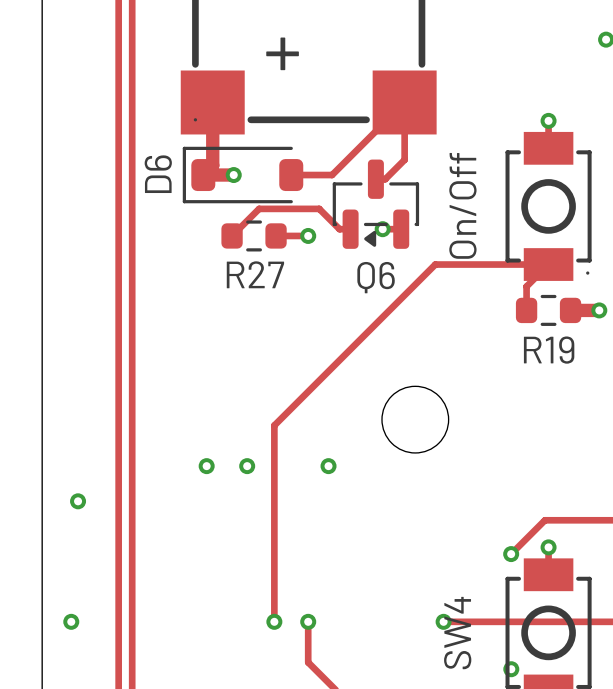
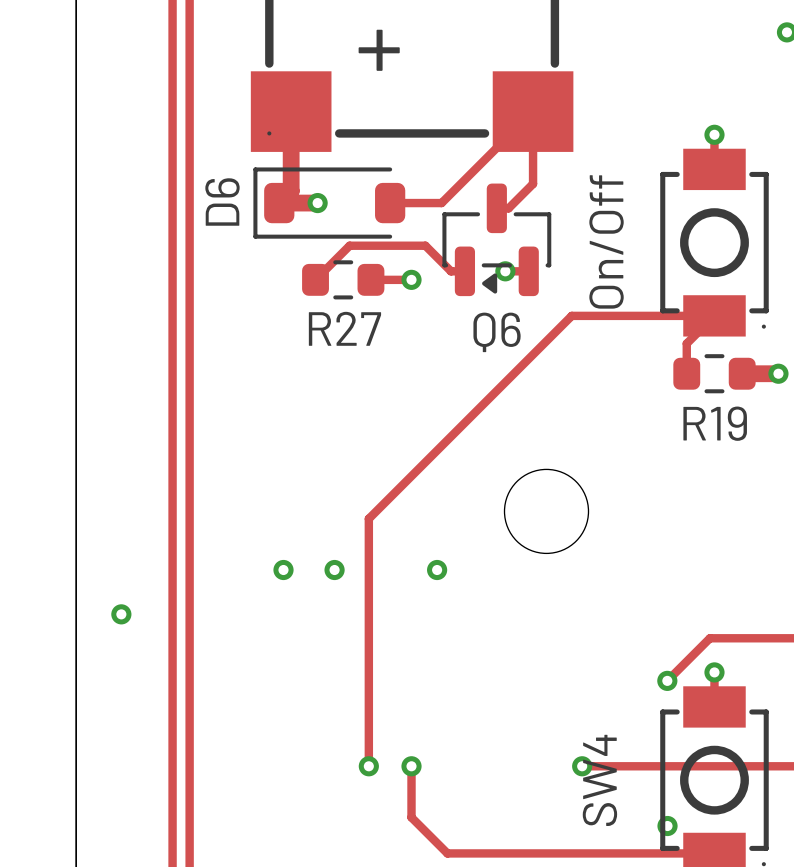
via: (71, 621) -> none

